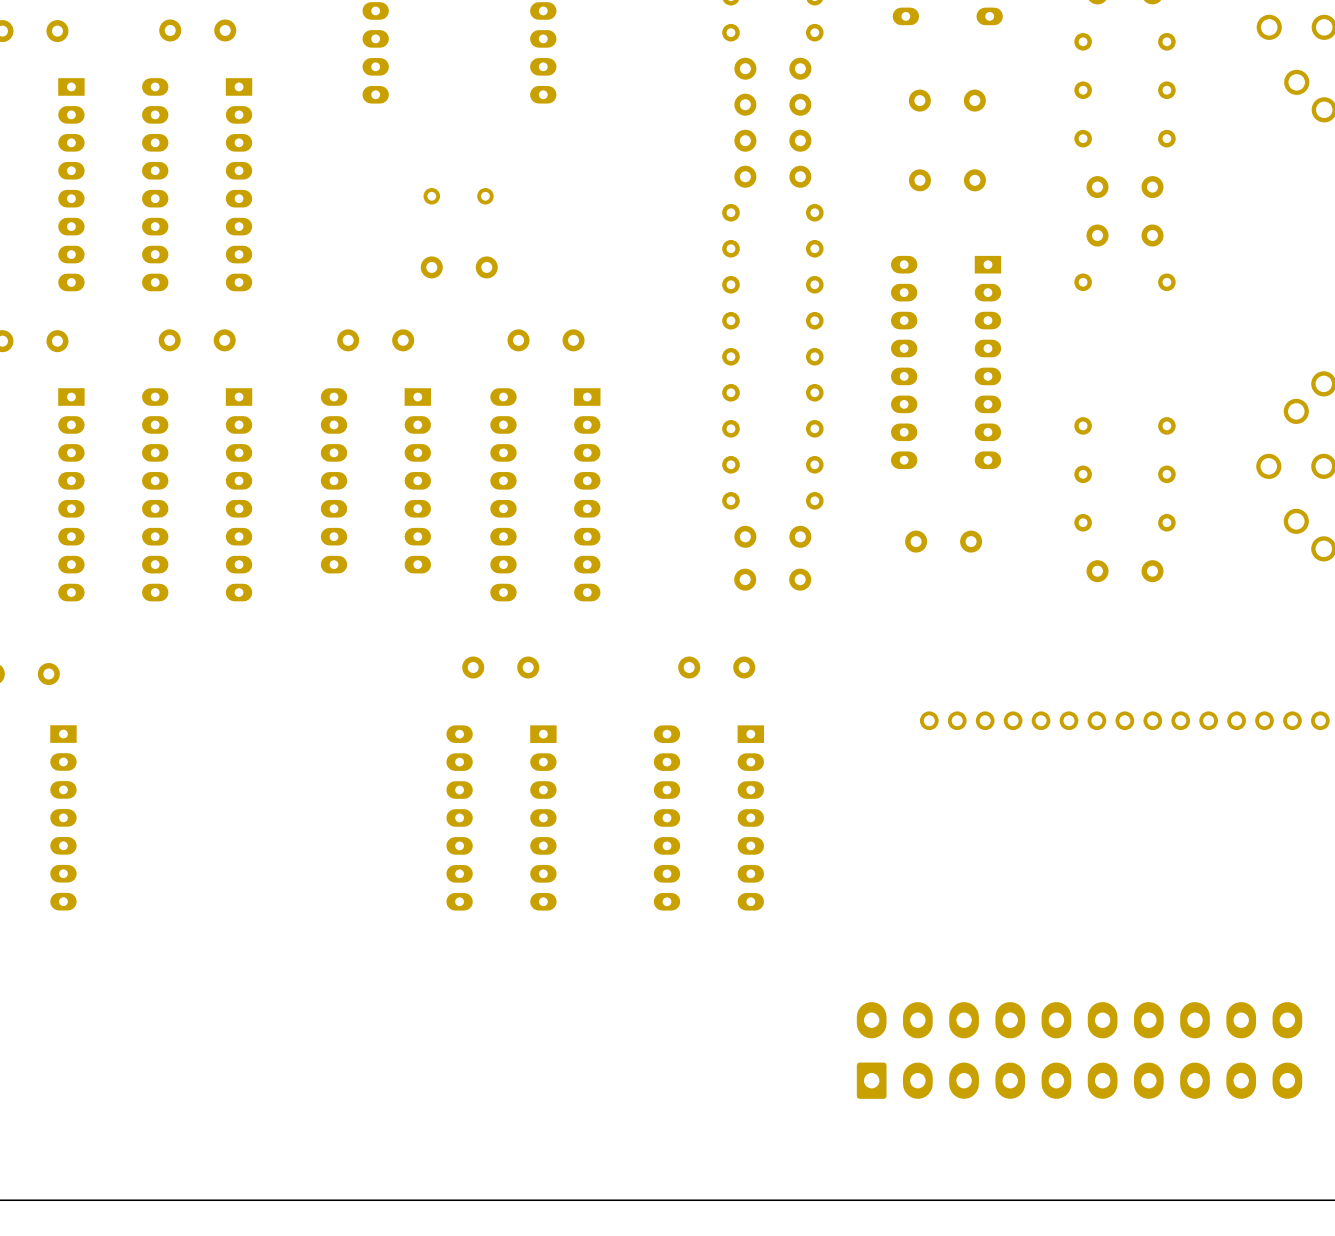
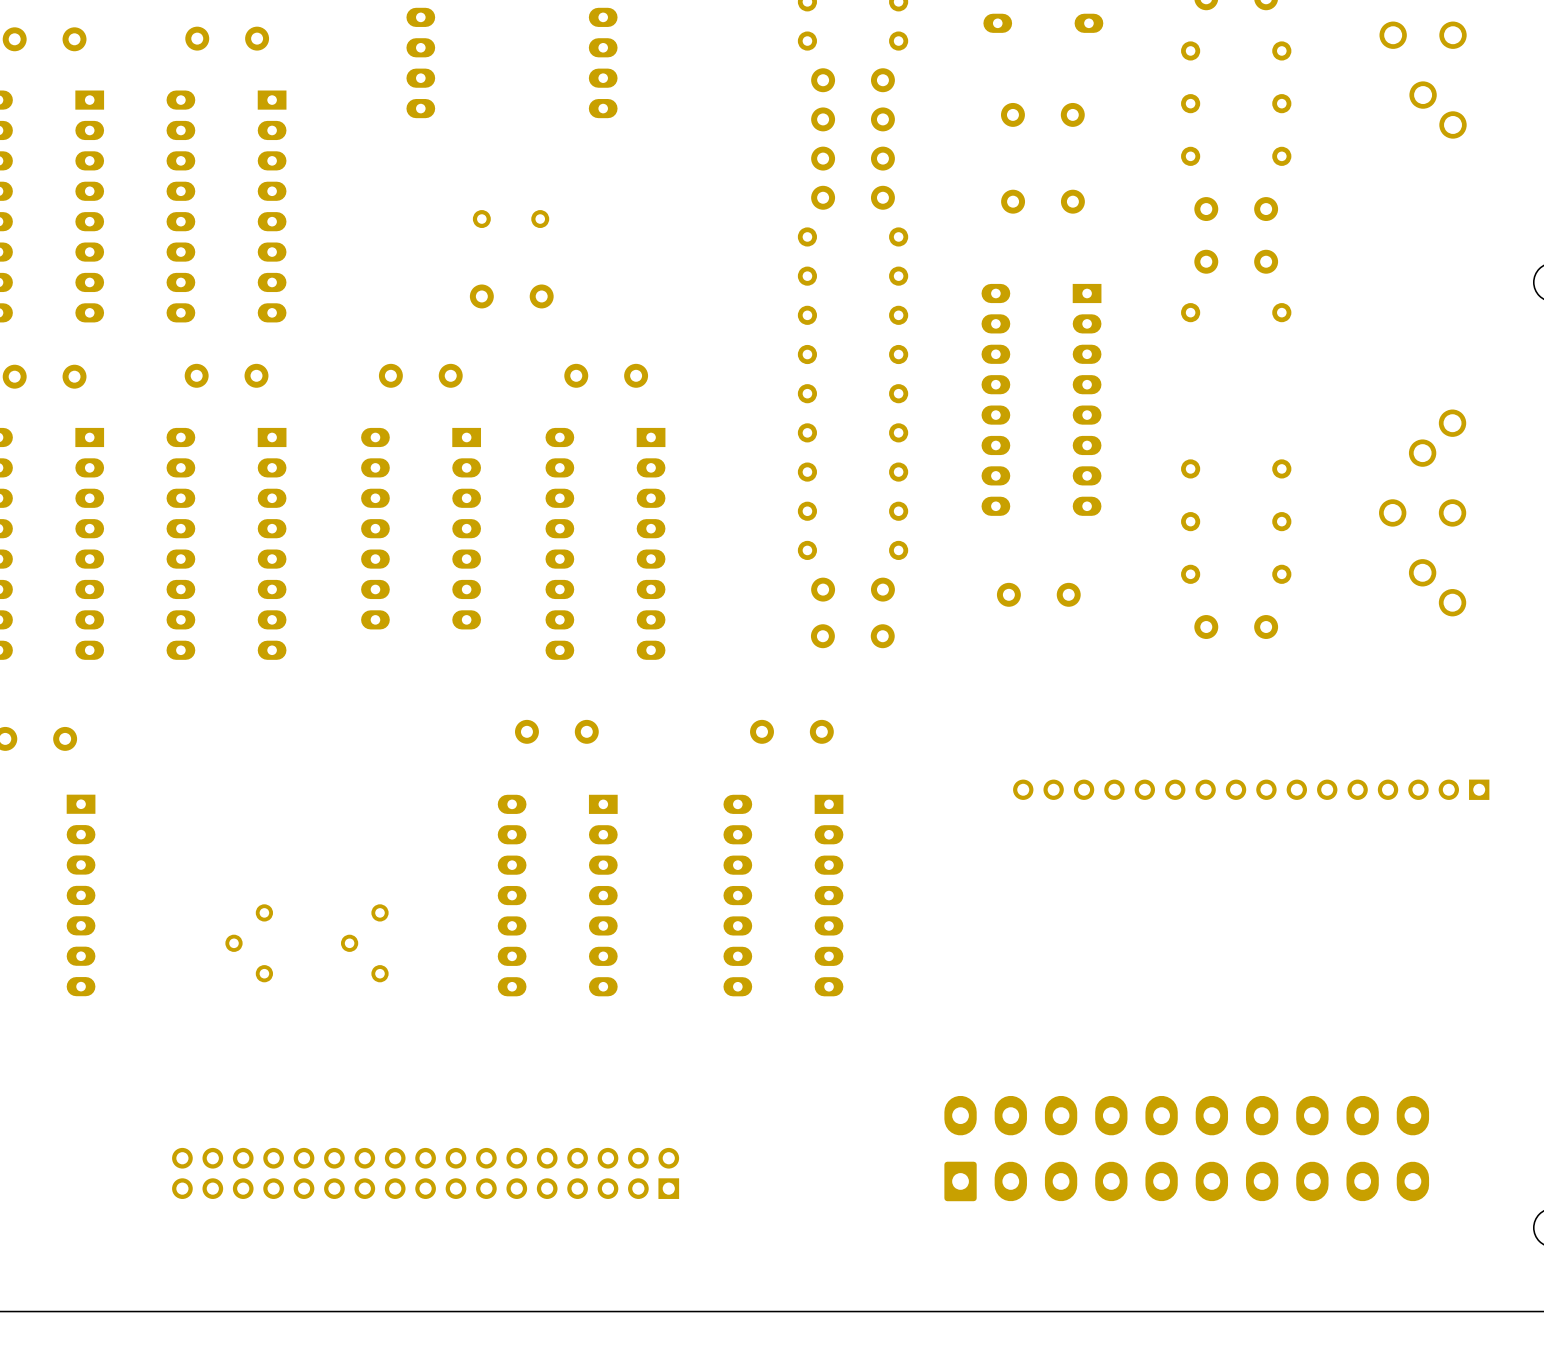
part: none -> (249, 943)
part: none -> (364, 943)
part: none -> (425, 1173)

